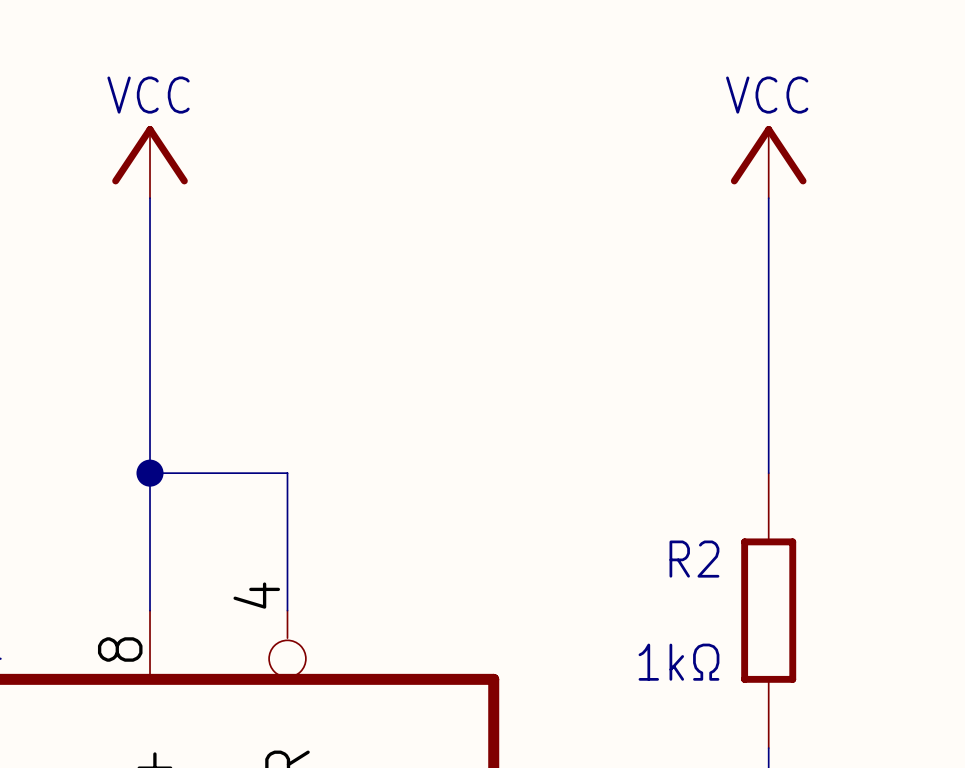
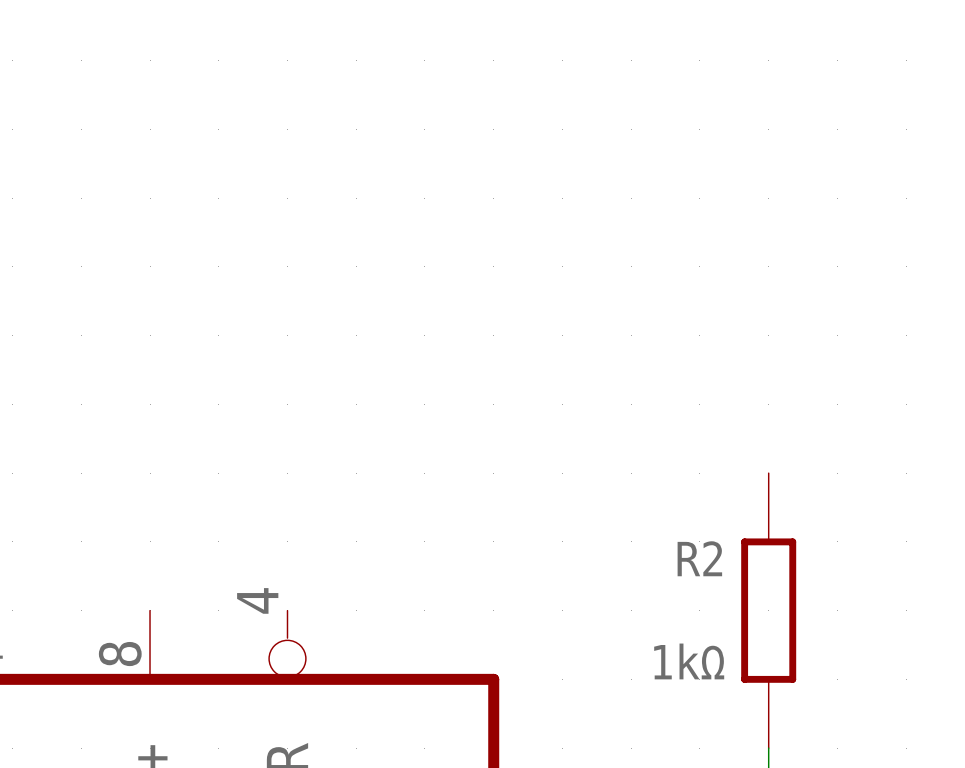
part: (150, 162) -> none
power symbol: VCC (768, 162) -> none
wire: (150, 198) (150, 610) -> none
wire: (768, 198) (768, 473) -> none
wire: (150, 473) (287, 473) (287, 610) -> none
junction: (150, 473) -> none

